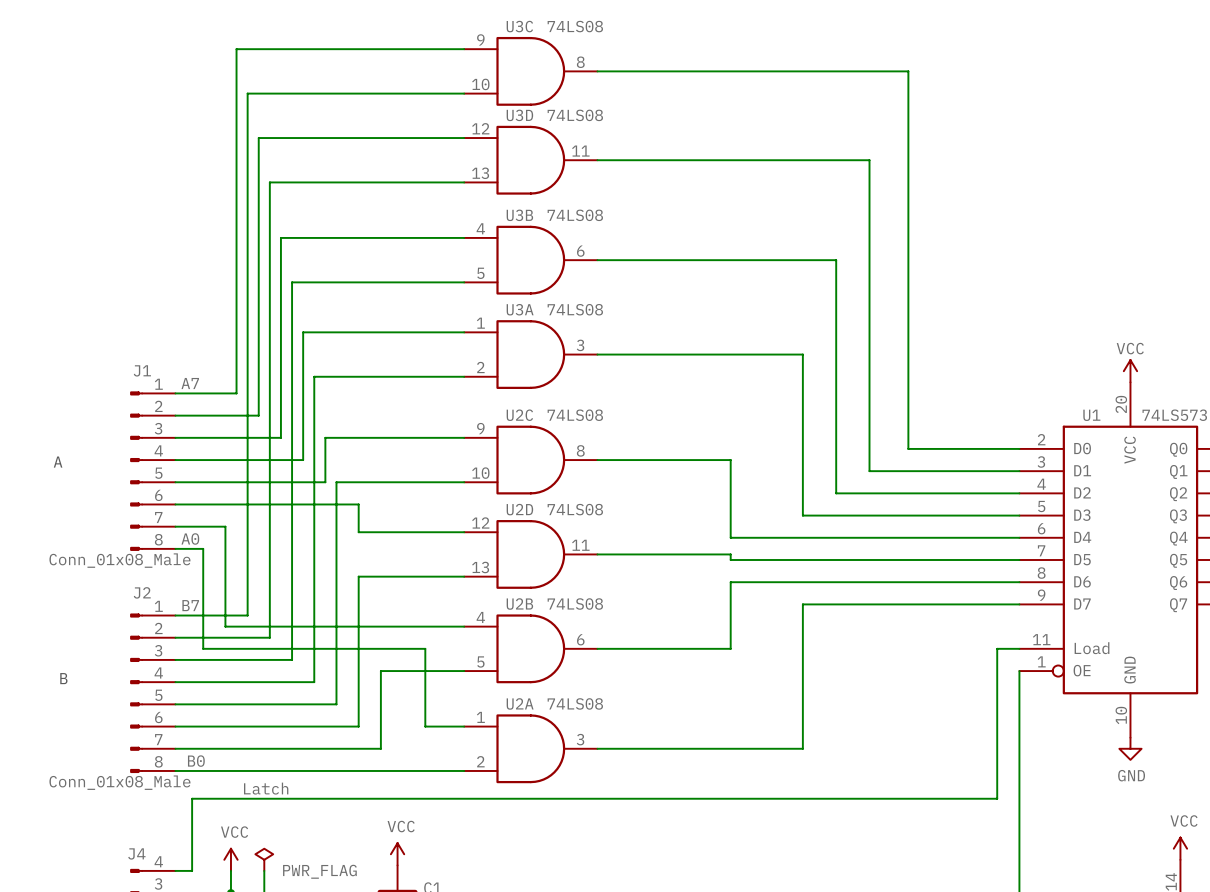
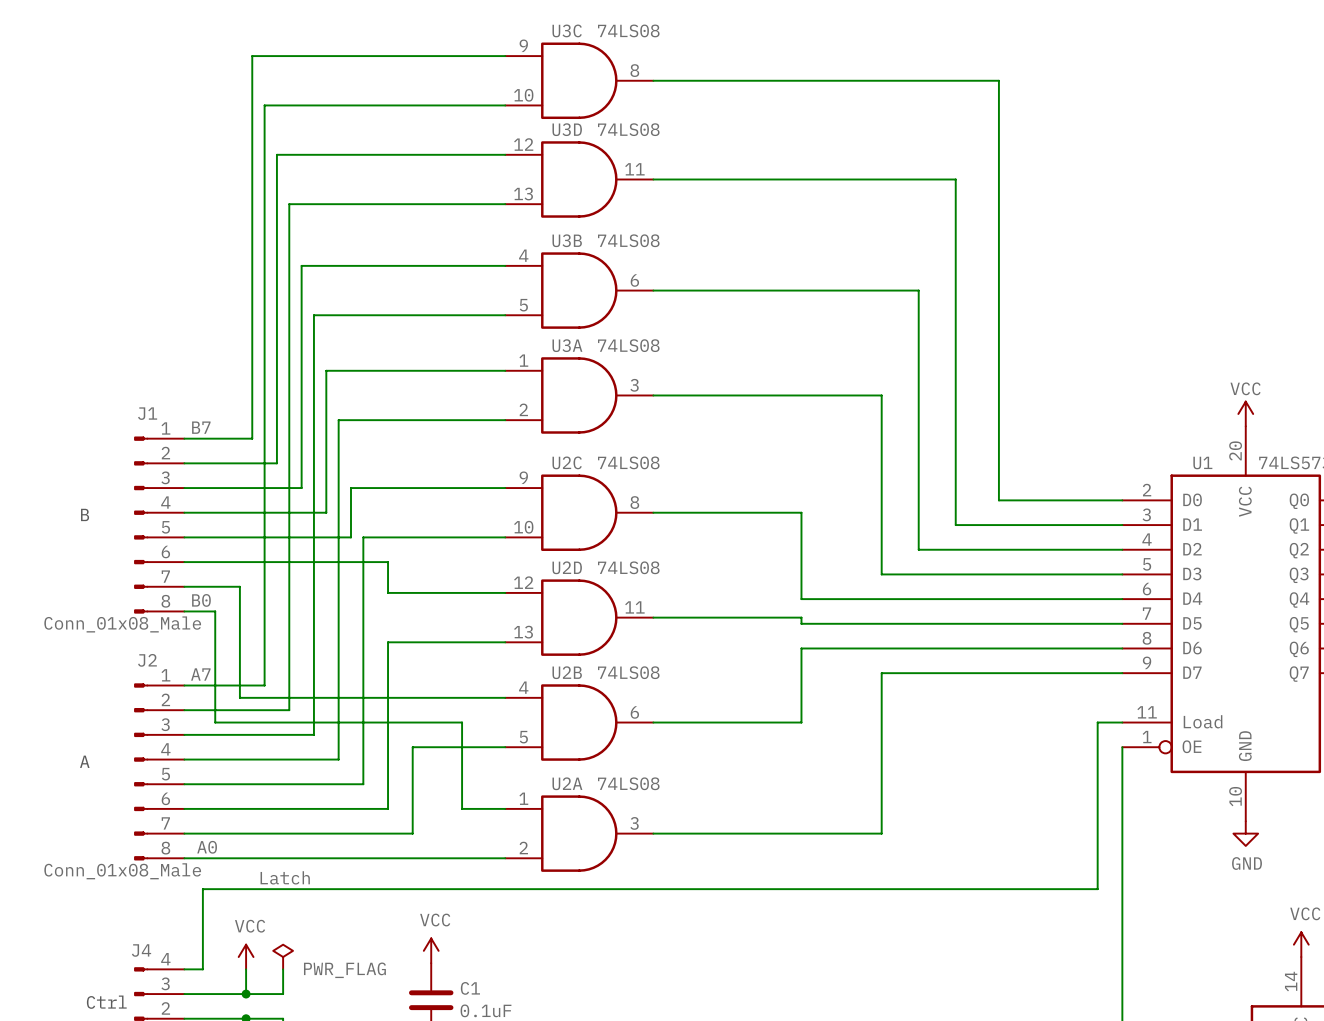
label: A7 (190, 383) -> B7 (201, 427)
text: A (58, 462) -> none
label: A0 (190, 538) -> B0 (201, 600)
label: B7 (190, 605) -> A7 (200, 674)
text position: B (63, 678) -> B (85, 514)
text: none -> A (84, 761)
label: B0 (196, 761) -> A0 (207, 847)

